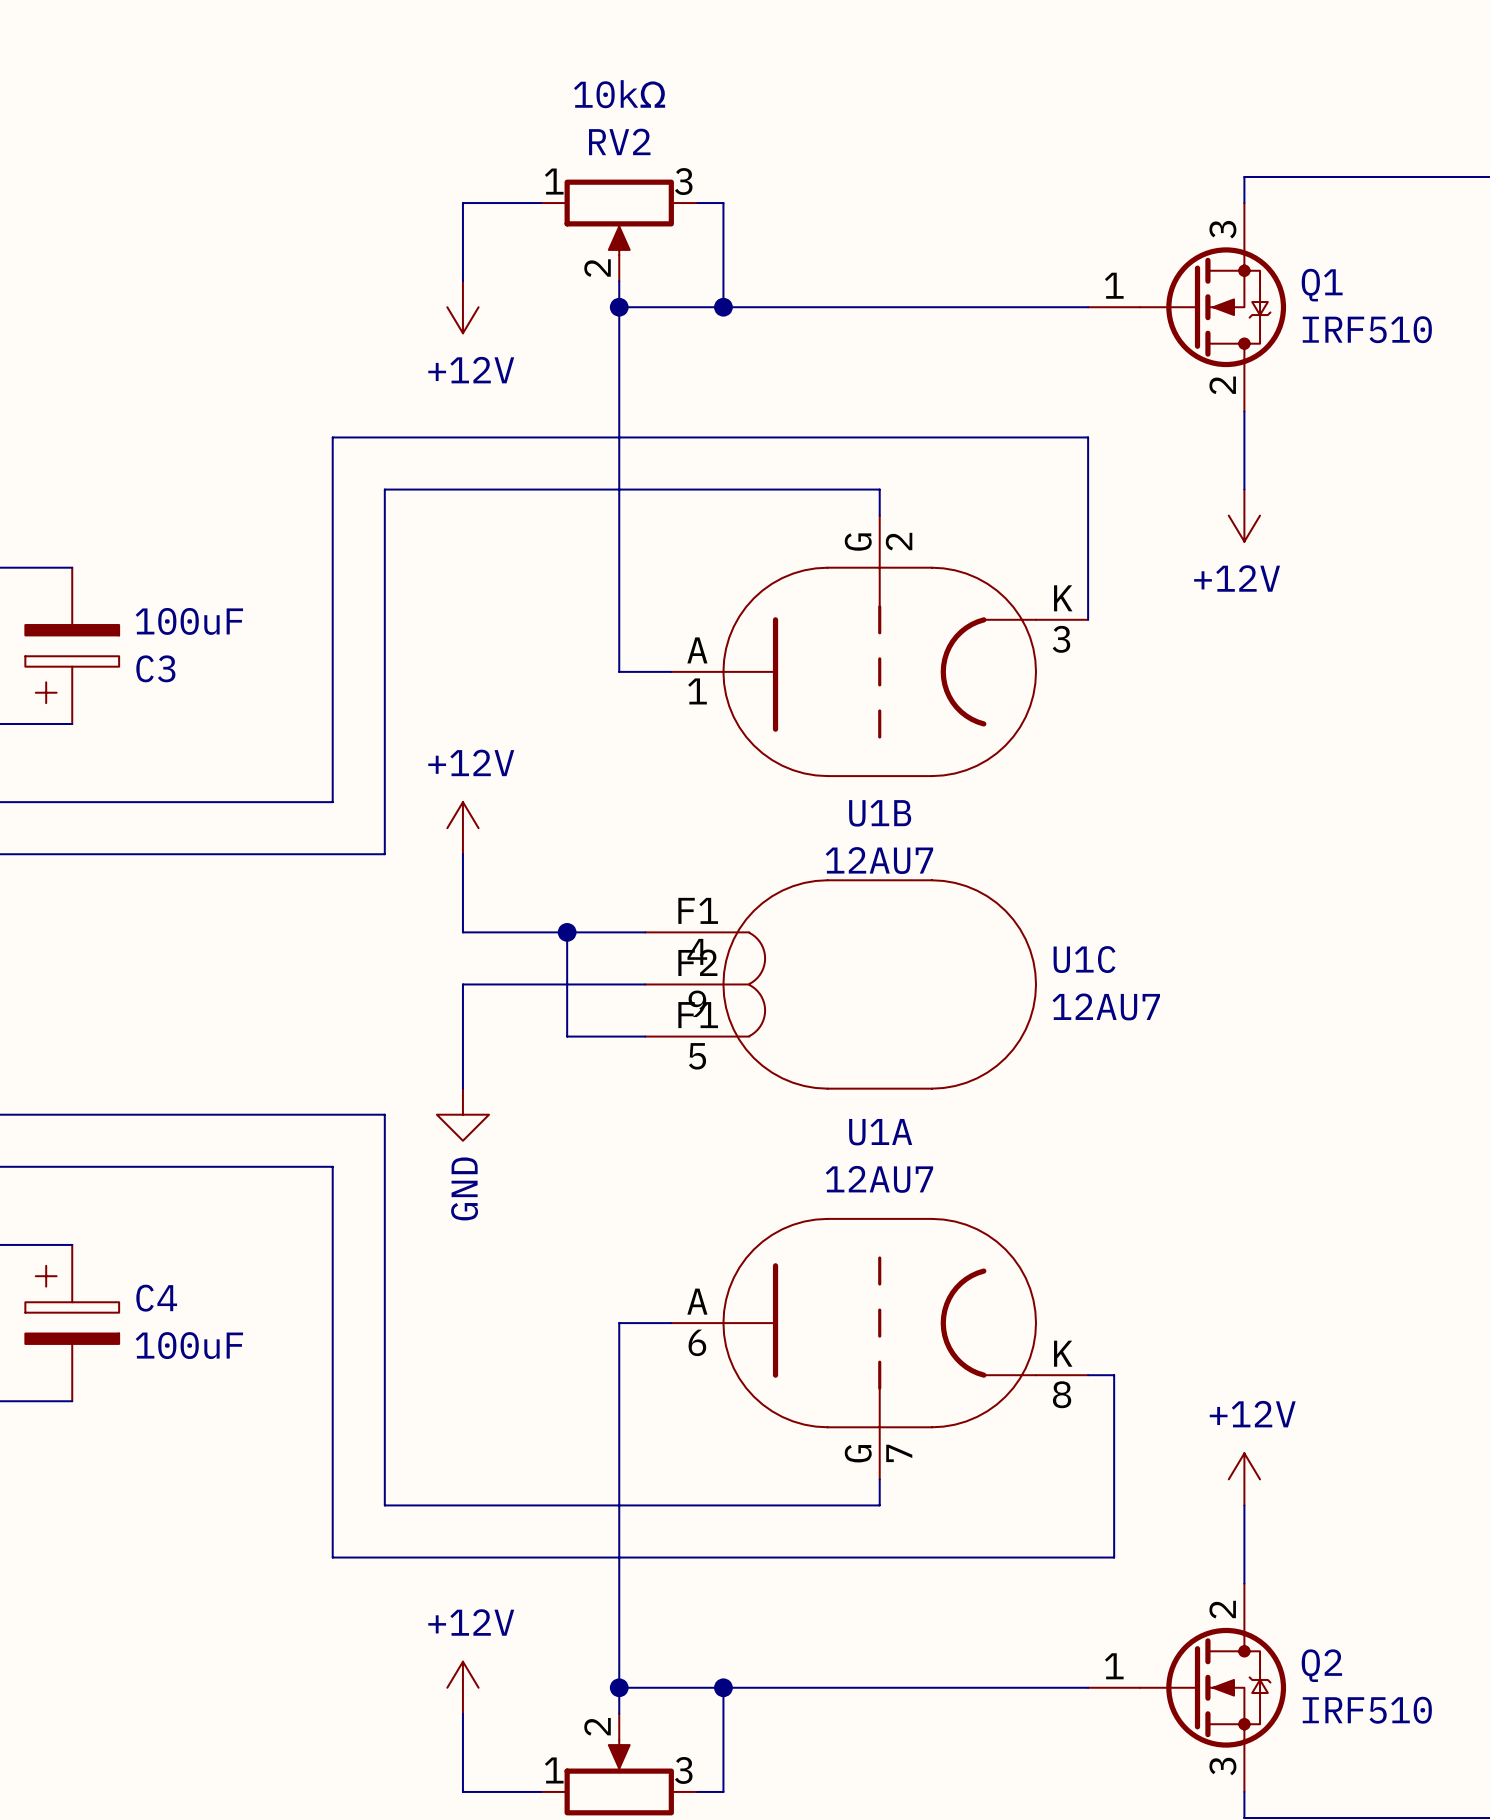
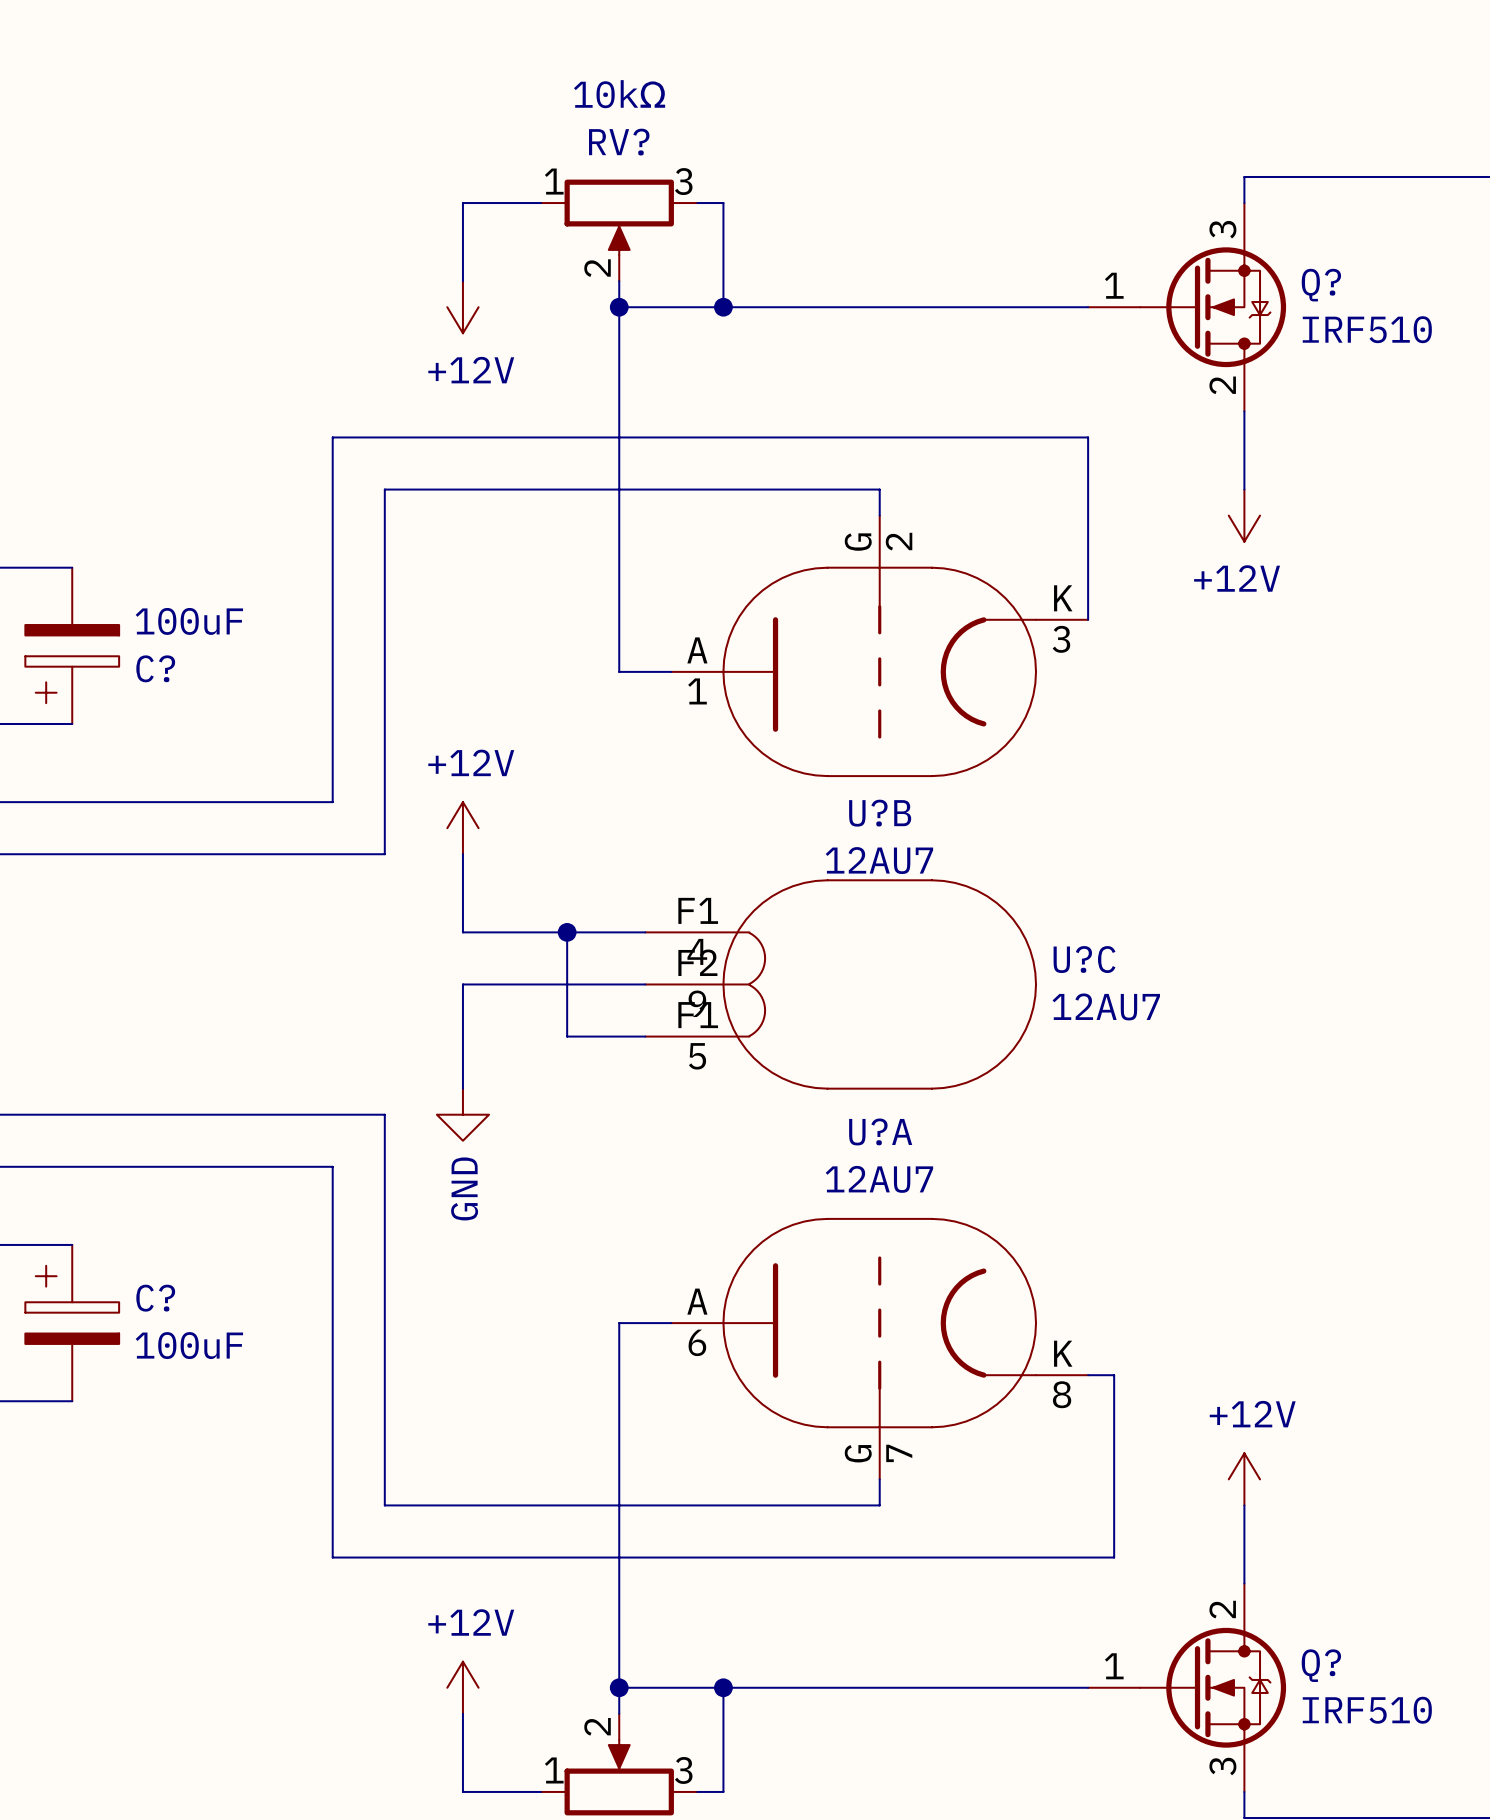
RV2 name: RV2 (619, 141) -> RV? (619, 142)
Q1 name: Q1 (1322, 285) -> Q? (1321, 285)
C3 name: C3 (155, 668) -> C? (155, 668)
U1B name: U1B (880, 813) -> U?B (880, 813)
U1C name: U1C (1084, 959) -> U?C (1084, 959)
U1A name: U1A (880, 1132) -> U?A (880, 1131)
C4 name: C4 (156, 1298) -> C? (155, 1298)
Q2 name: Q2 (1321, 1665) -> Q? (1321, 1665)

